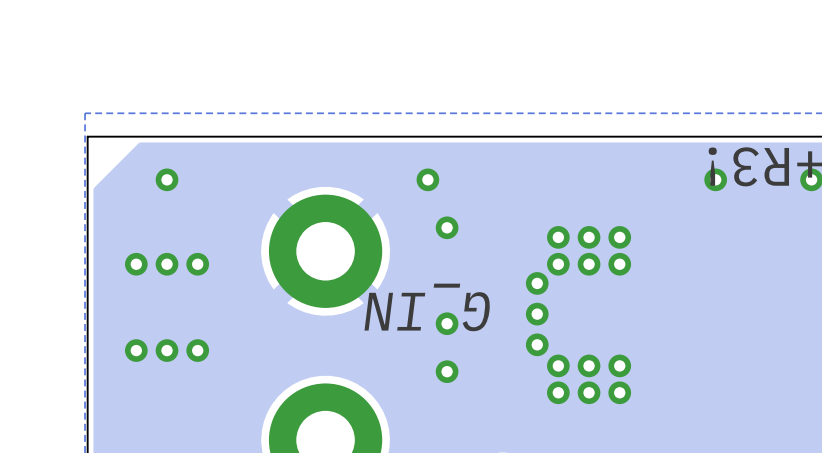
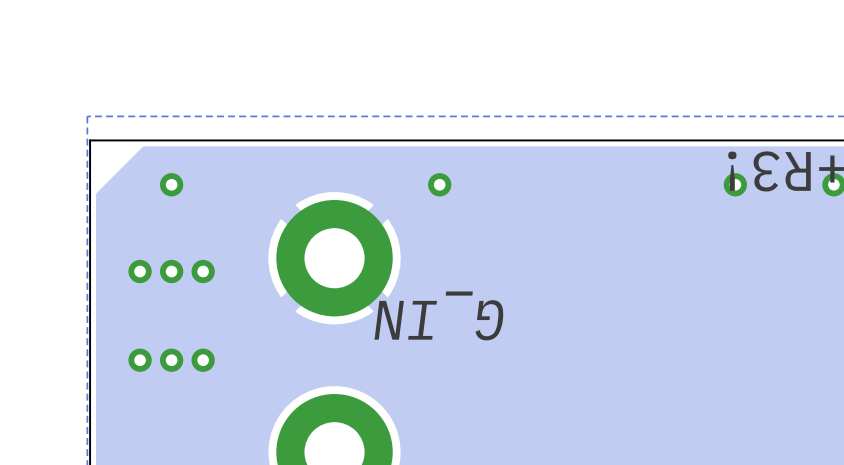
via: (447, 227) -> none
via: (558, 237) -> none
via: (589, 237) -> none
via: (619, 237) -> none
via: (558, 264) -> none
via: (589, 264) -> none
via: (619, 264) -> none
via: (537, 283) -> none
via: (537, 314) -> none
via: (447, 323) -> none
via: (537, 344) -> none
via: (558, 365) -> none
via: (589, 365) -> none
via: (619, 365) -> none
via: (447, 371) -> none
via: (558, 392) -> none
via: (589, 392) -> none
via: (619, 392) -> none

